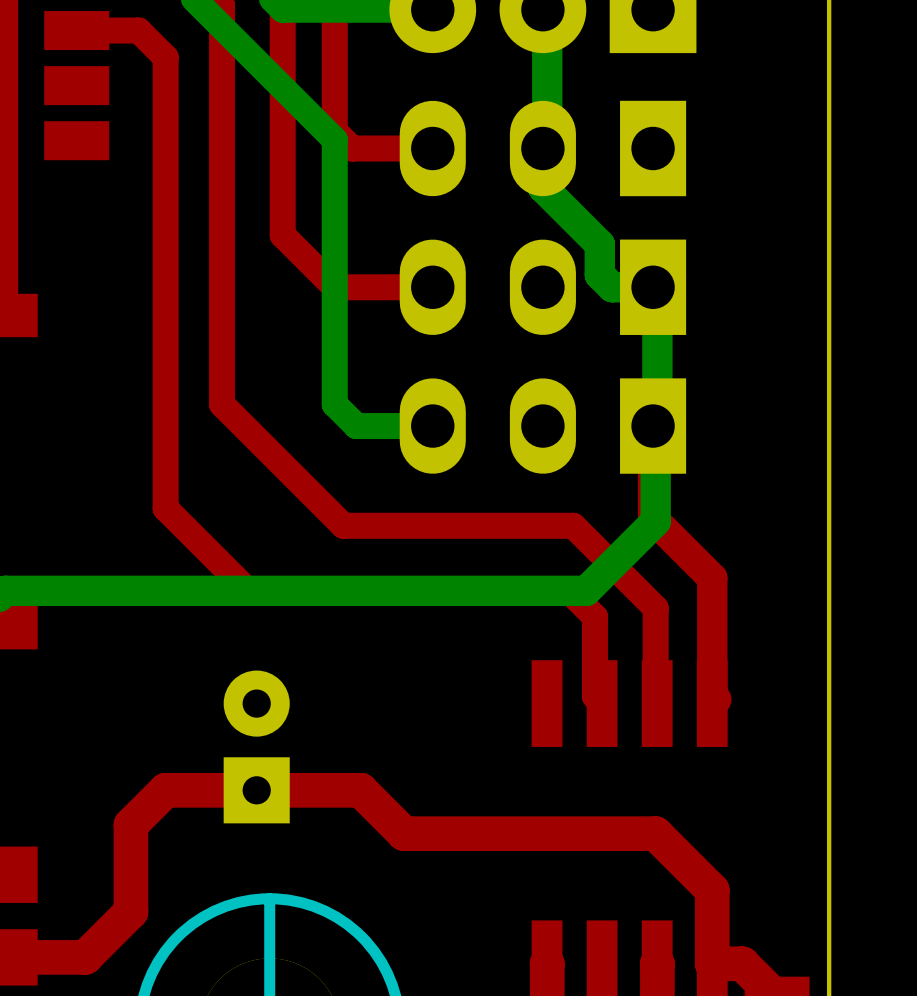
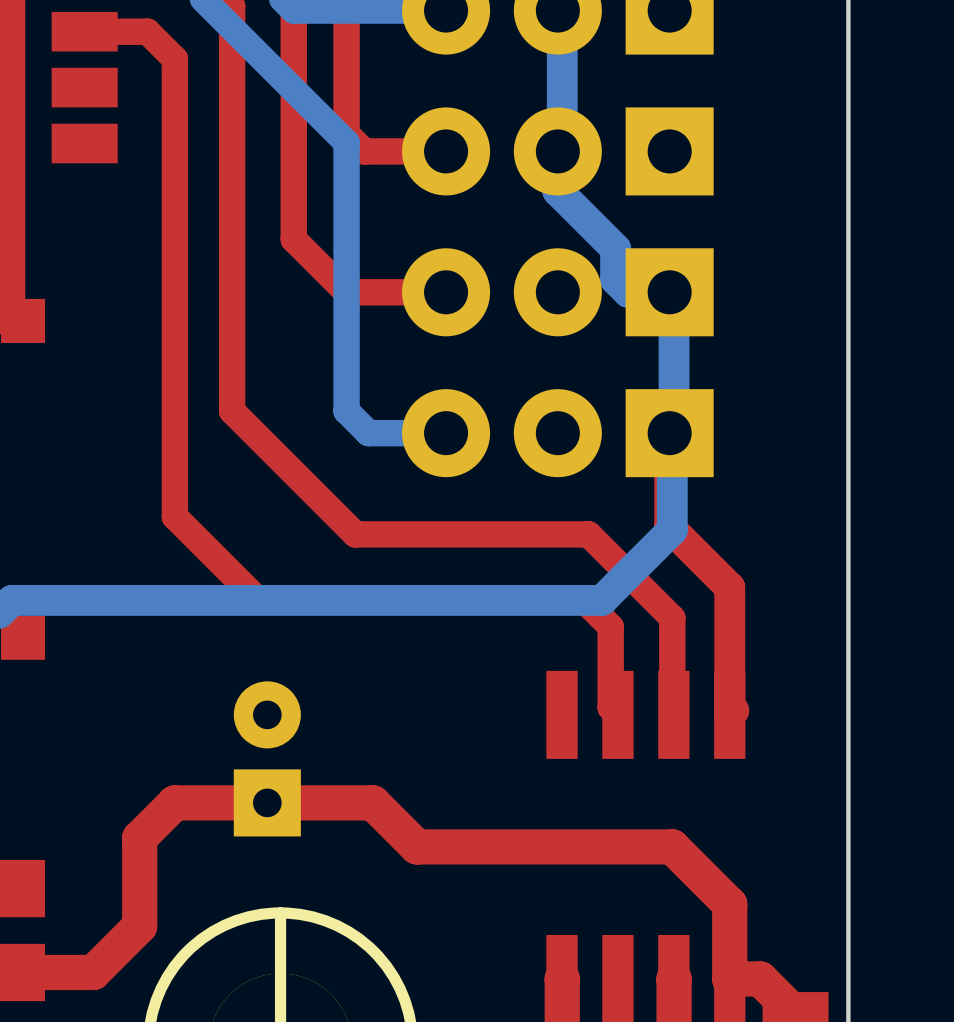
part footprint: [399, 100, 687, 197] -> [402, 107, 714, 196]
part footprint: [399, 239, 687, 335] -> [402, 248, 714, 337]
part footprint: [399, 378, 687, 474] -> [402, 389, 714, 478]

